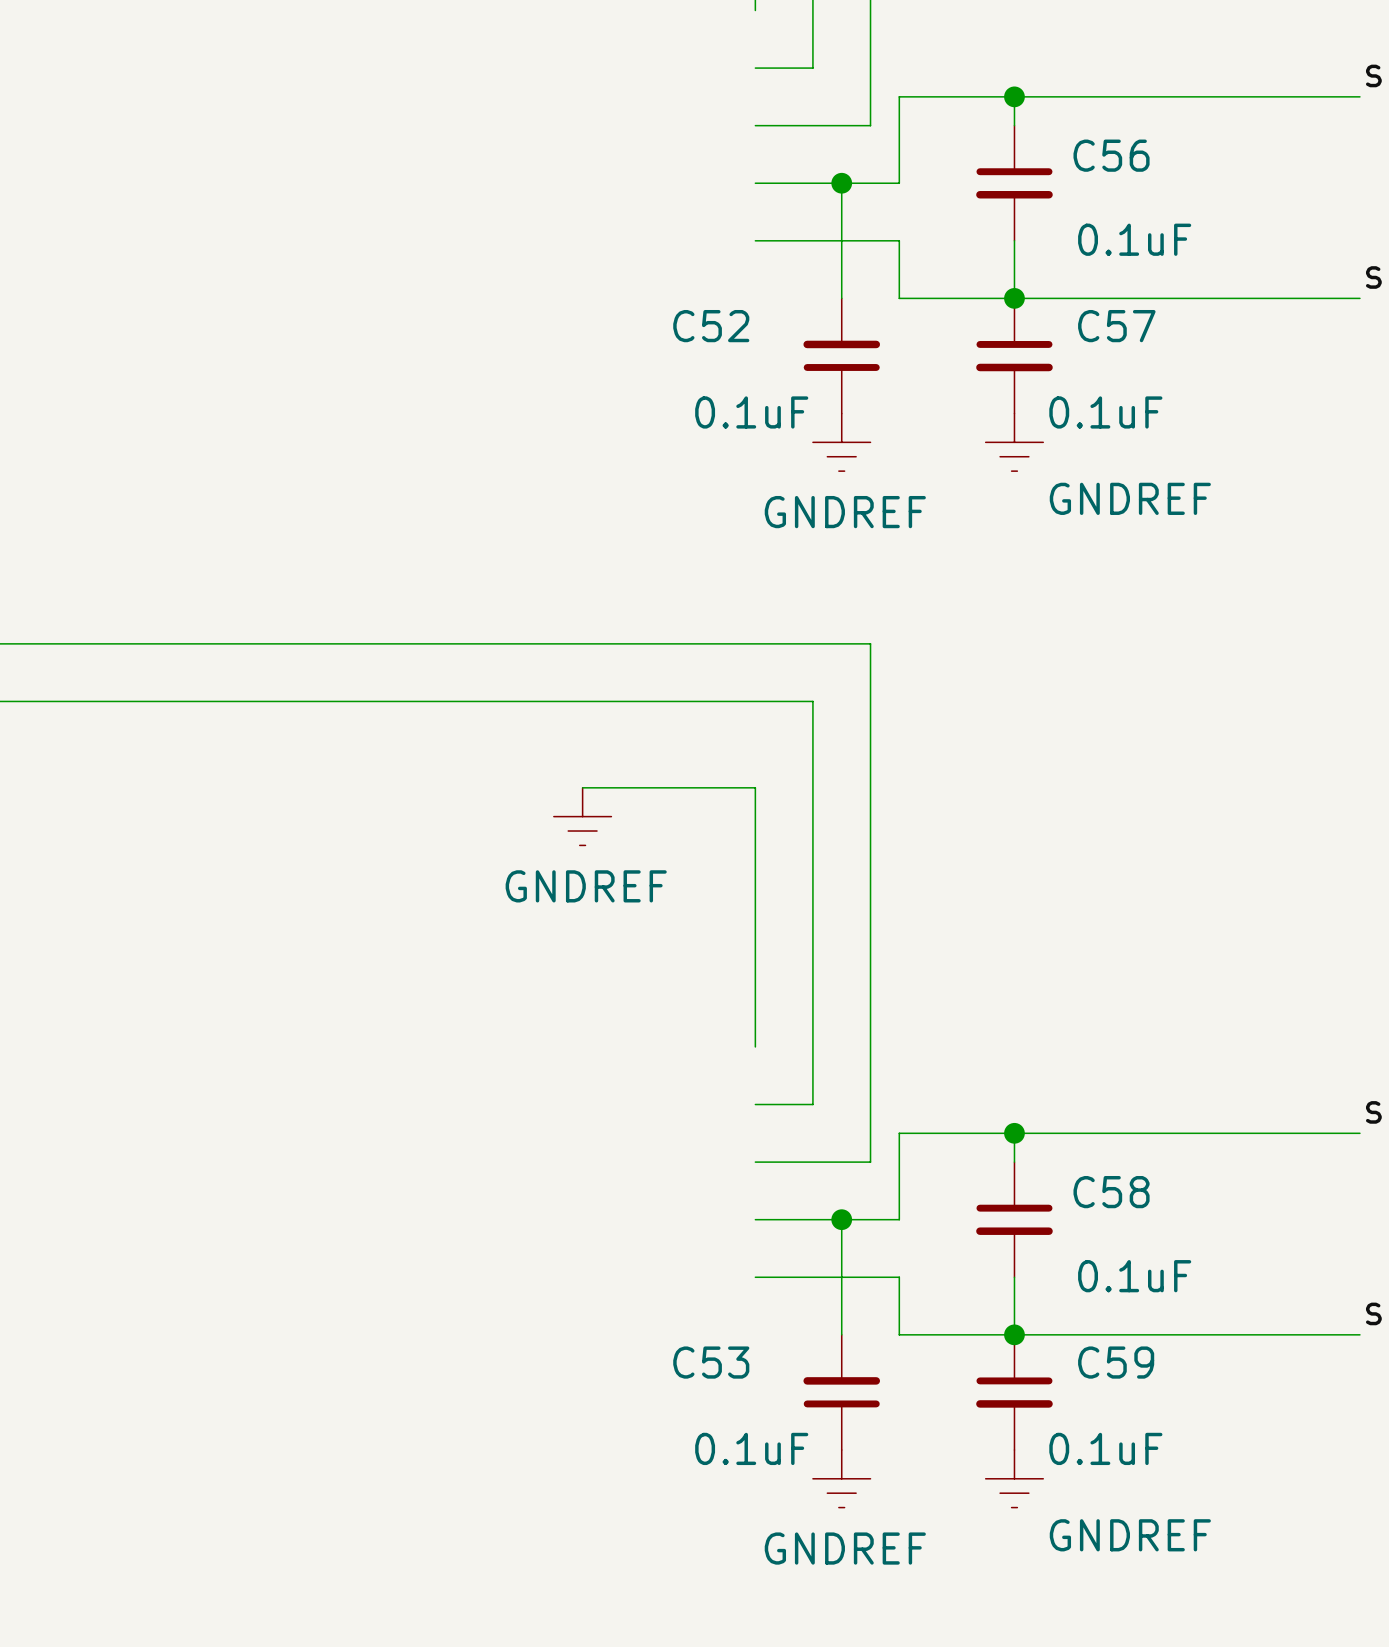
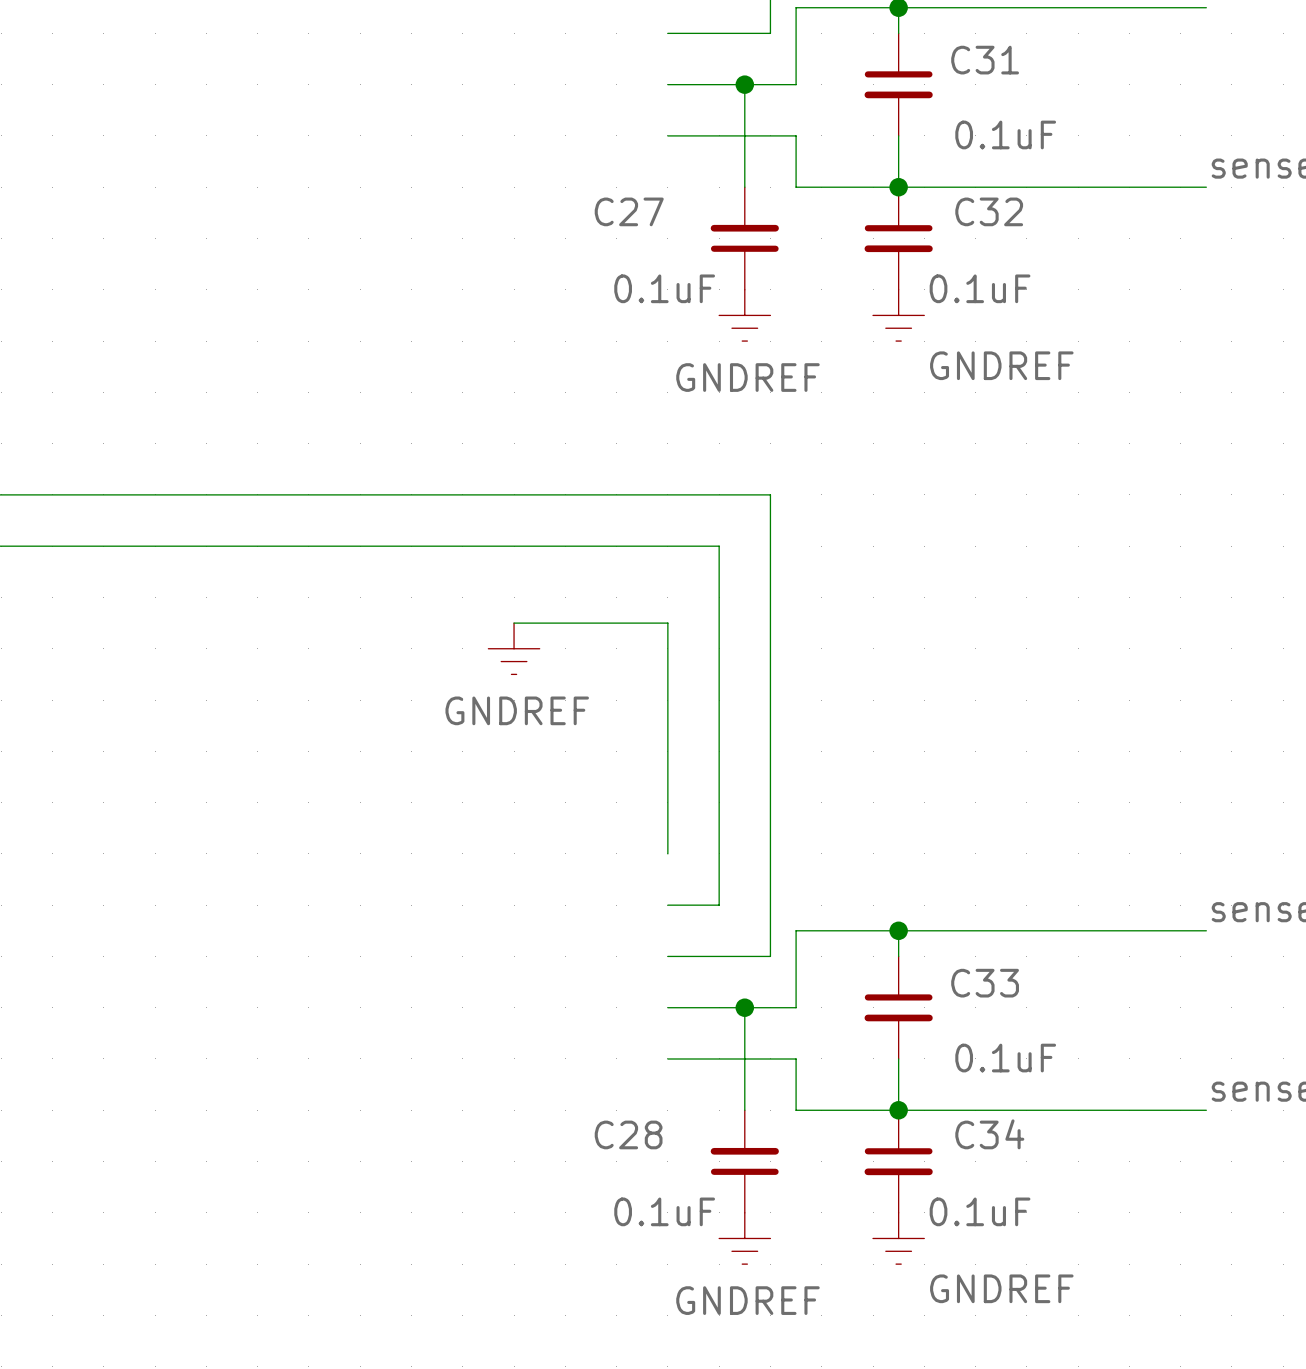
C56 name: C56 (1111, 155) -> C31 (985, 60)
C52 name: C52 (711, 326) -> C27 (629, 211)
C57 name: C57 (1116, 326) -> C32 (989, 211)
C58 name: C58 (1111, 1192) -> C33 (985, 983)
C53 name: C53 (711, 1362) -> C28 (628, 1134)
C59 name: C59 (1116, 1362) -> C34 (989, 1134)

